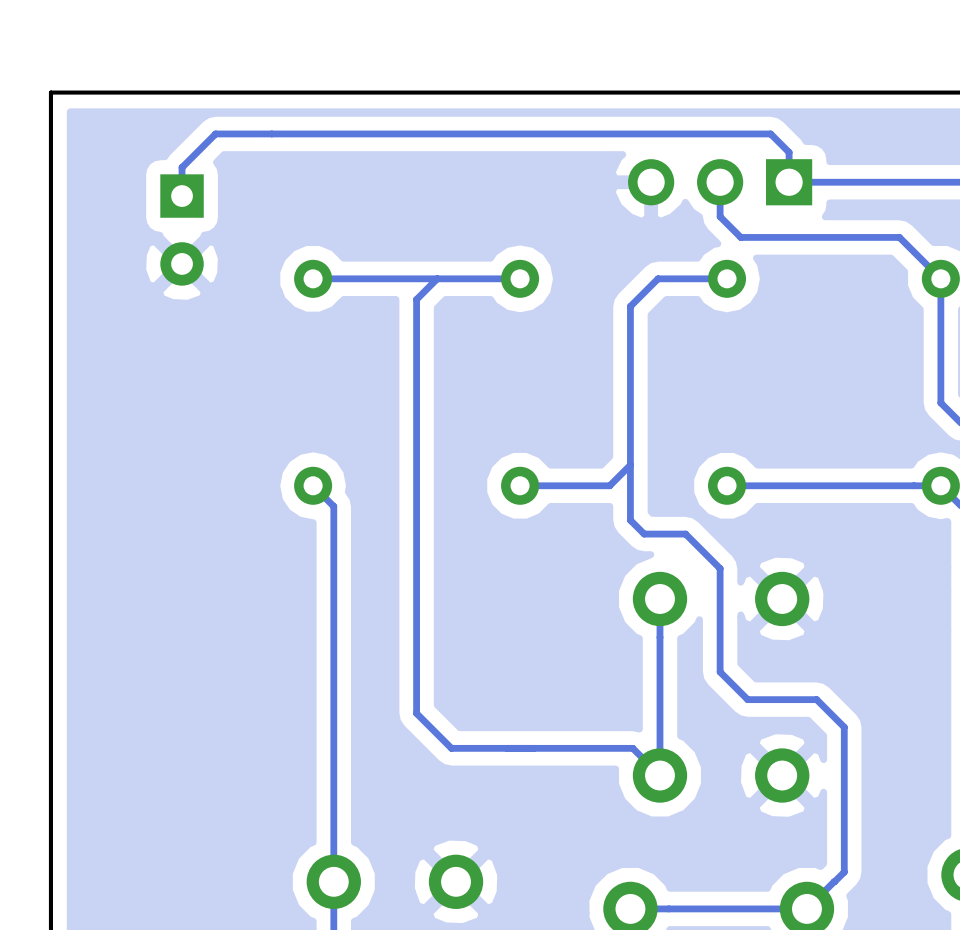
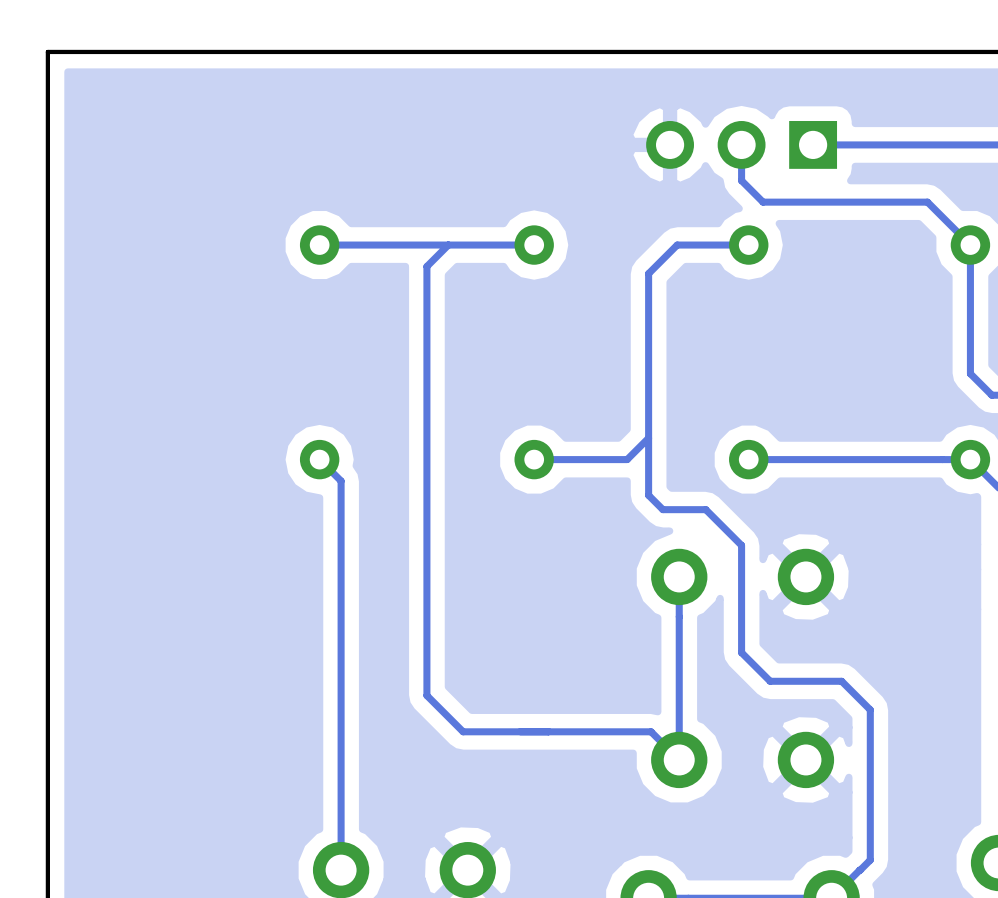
track: (789, 182) (789, 152) (770, 133) (215, 133) (182, 167) (182, 196) -> none
part: (182, 229) -> none

